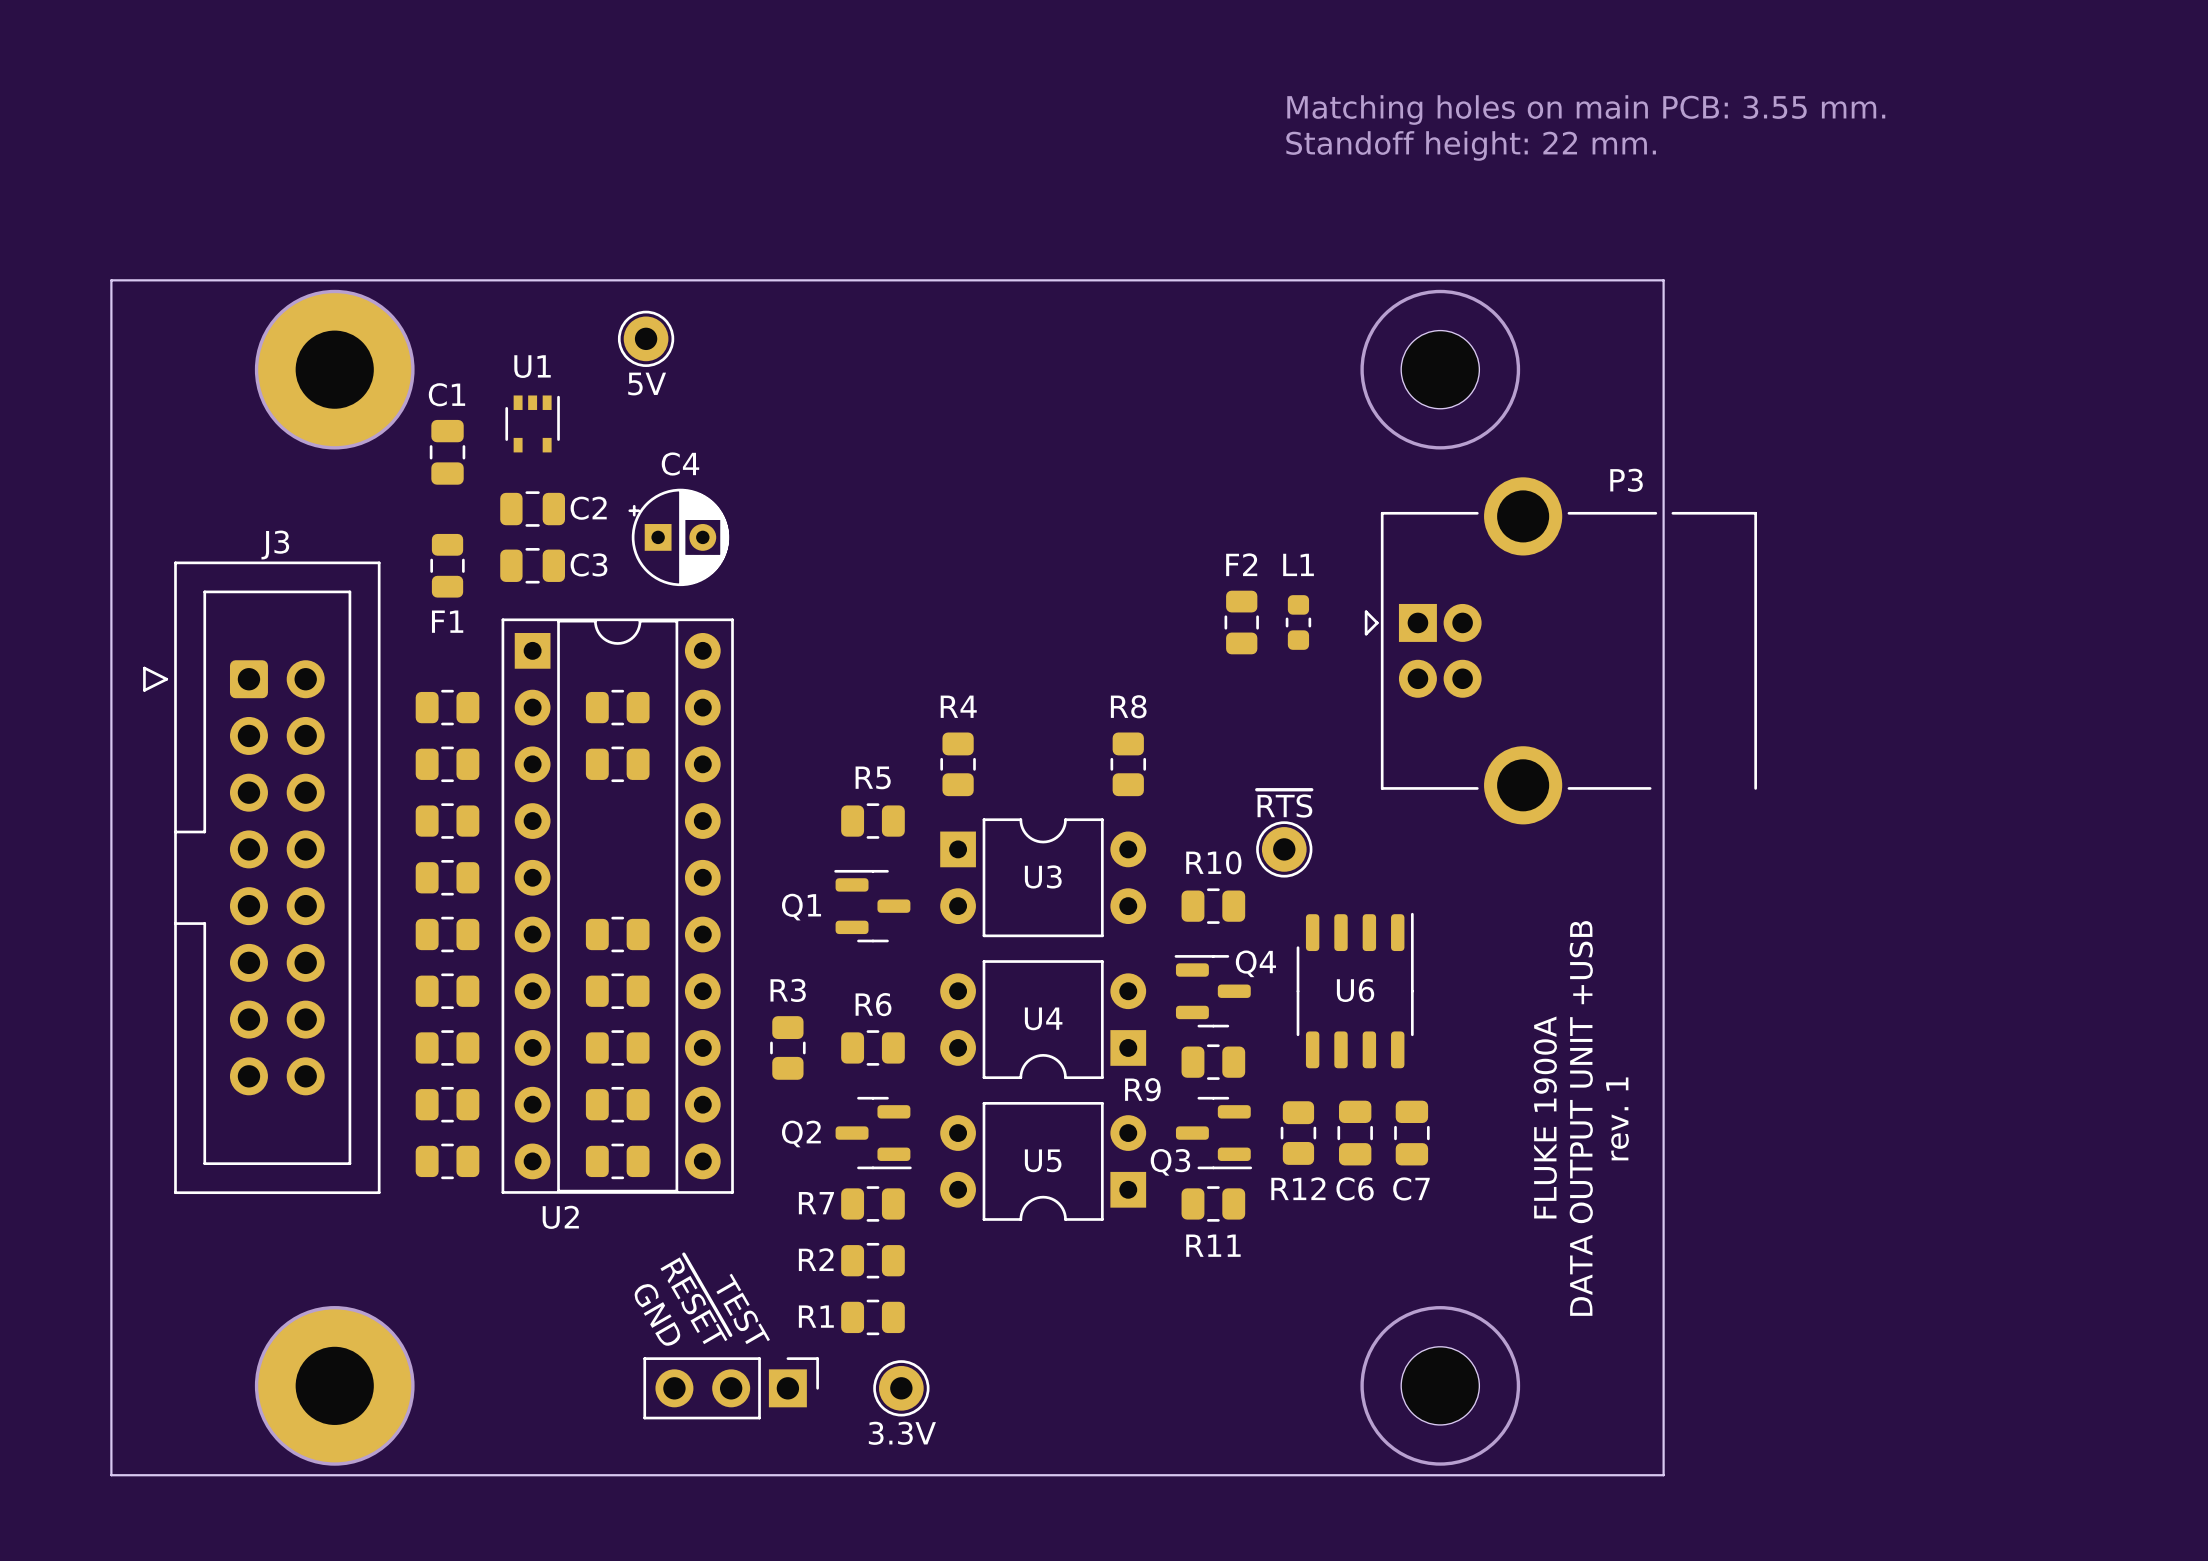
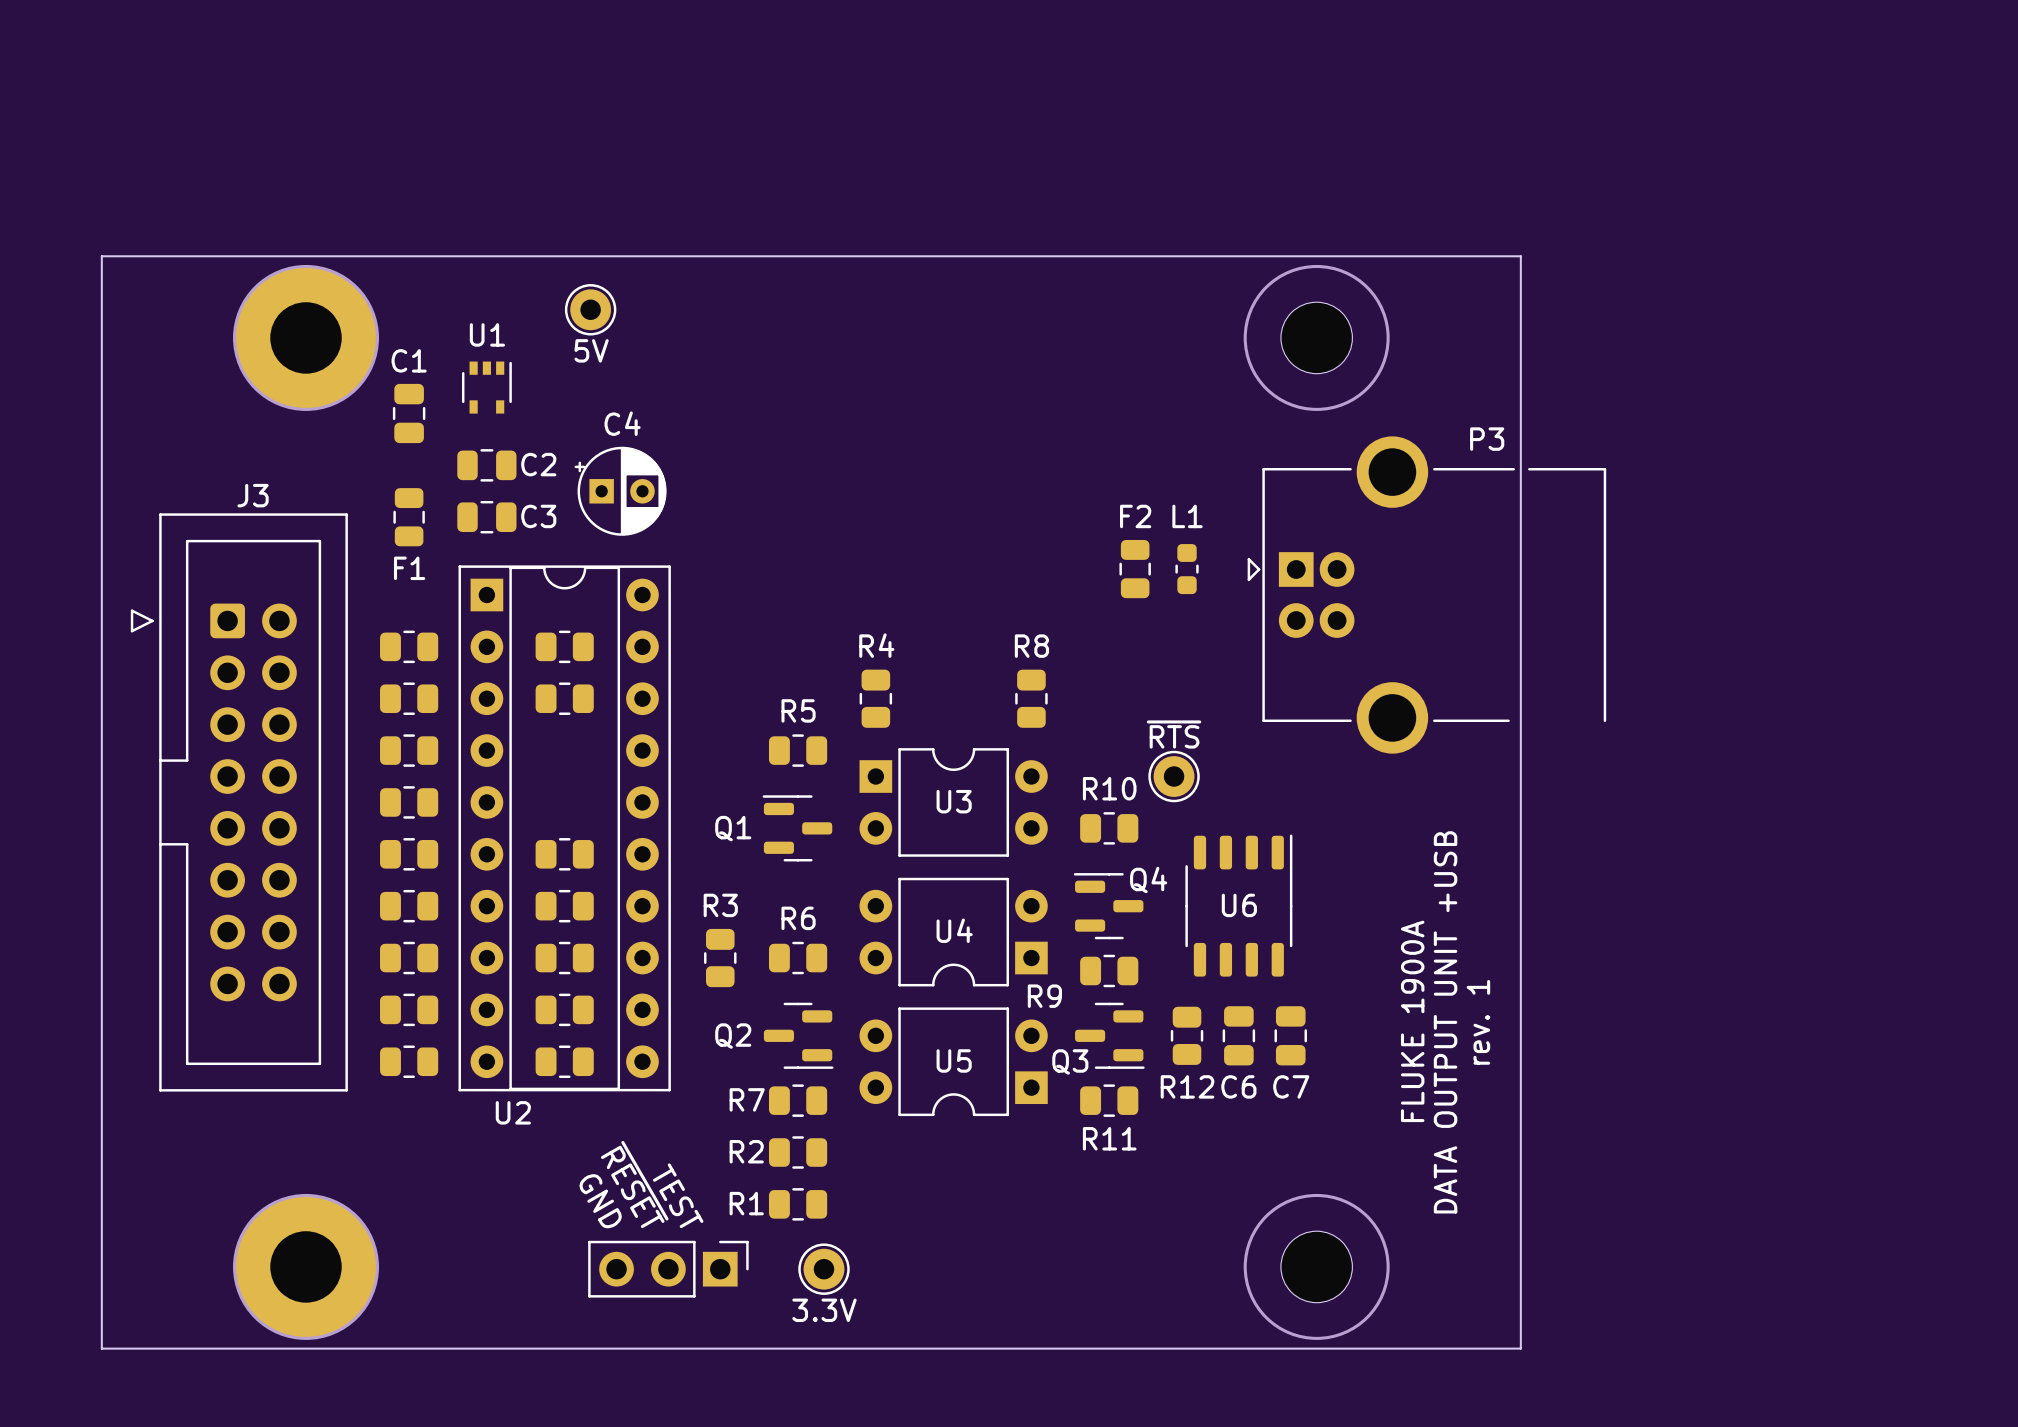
text: Matching holes on main PCB: 3.55 mm. (1586, 110) -> none
text: Standoff height: 22 mm. (1471, 145) -> none

